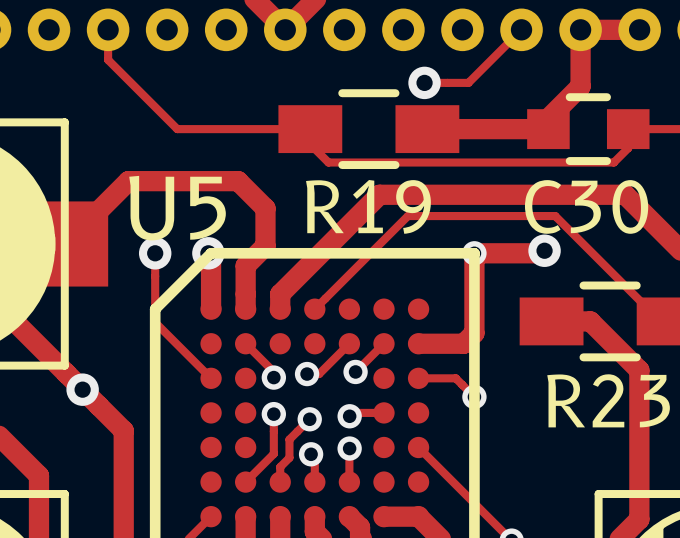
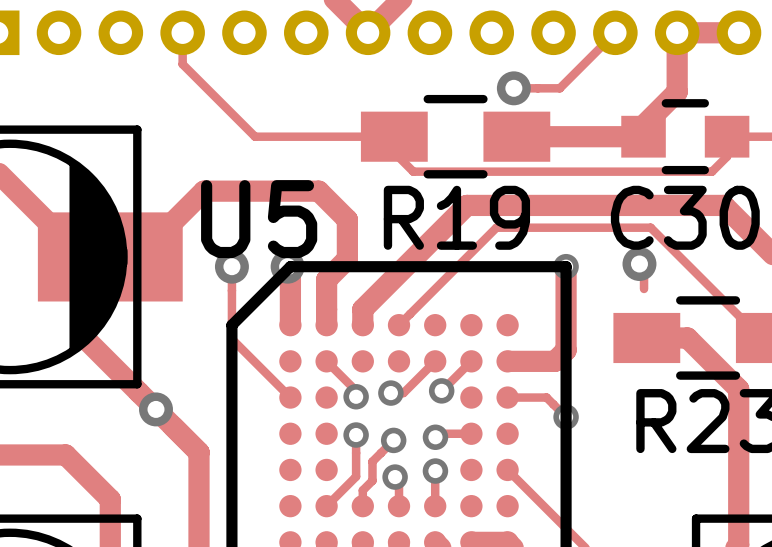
track: (544, 250) (542, 253) (474, 253) -> none
track: none -> (644, 266) (644, 288)

